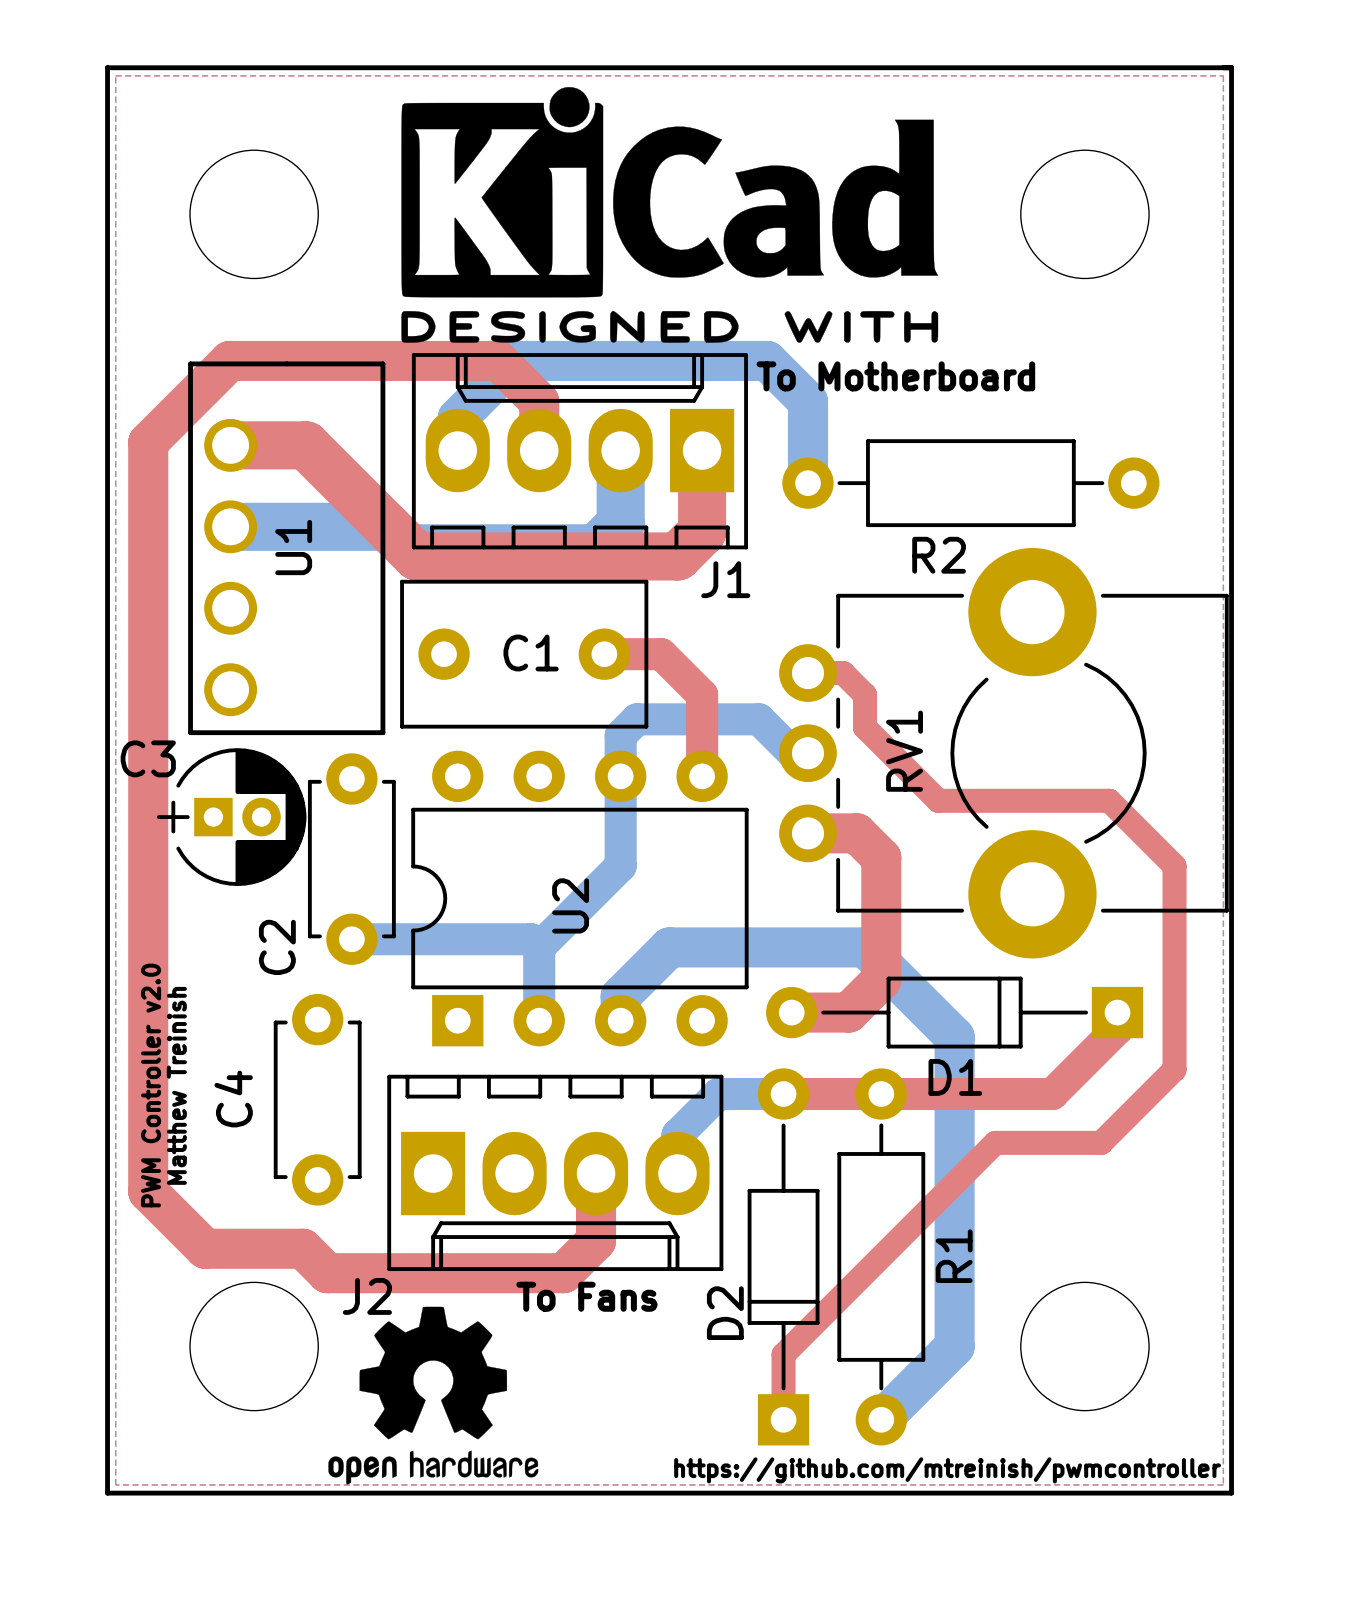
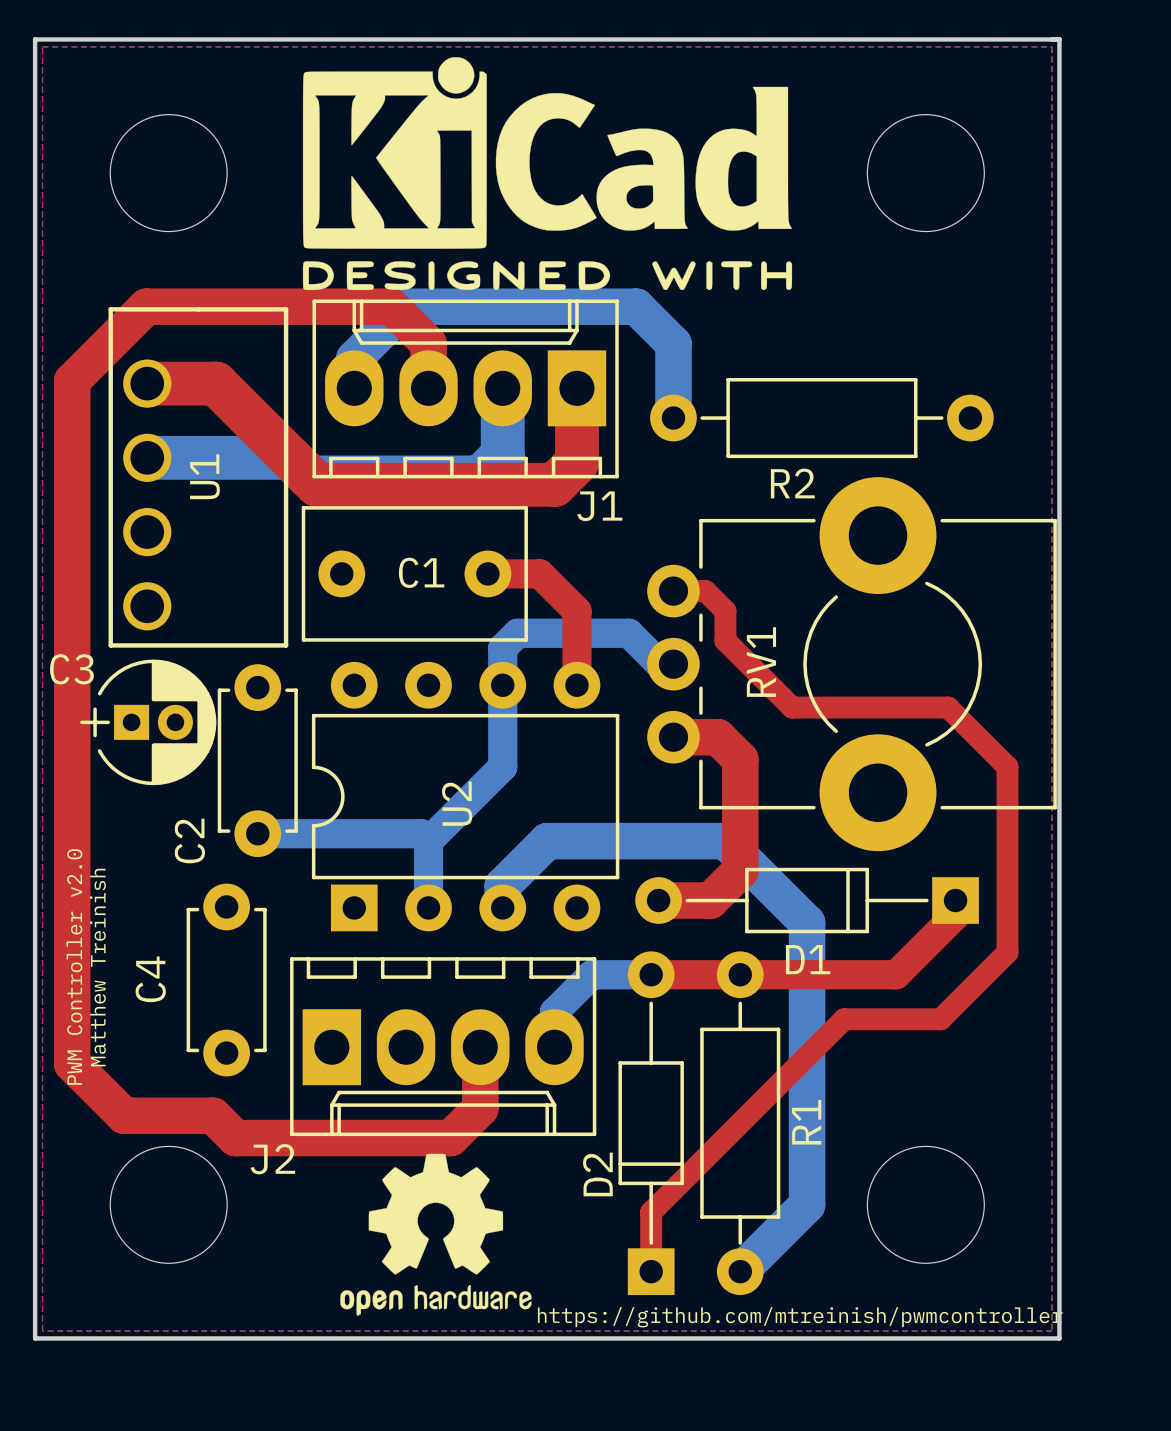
text: To Motherboard (895, 376) -> none
text: To Fans (586, 1296) -> none
drawing position: (433, 1395) -> (435, 1234)

